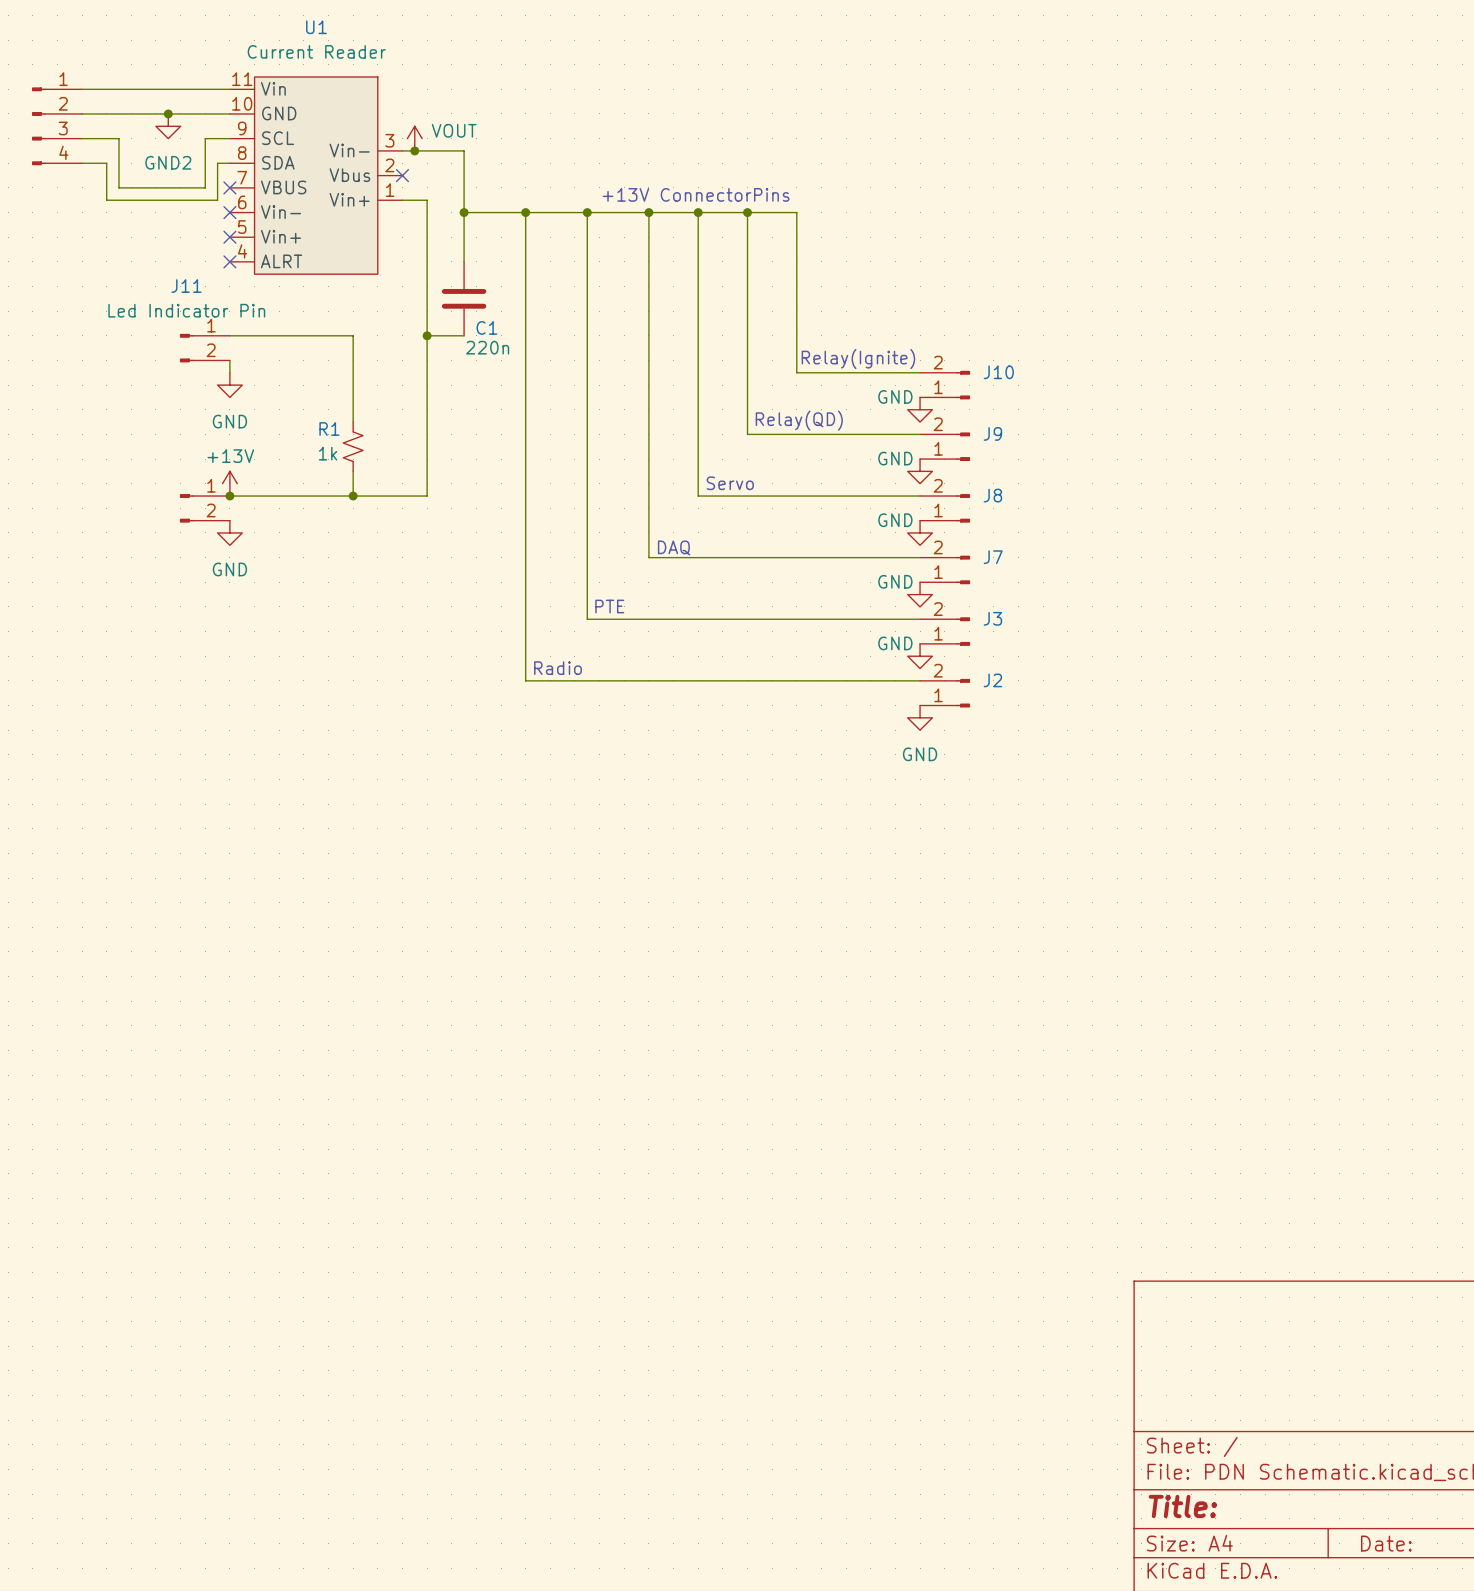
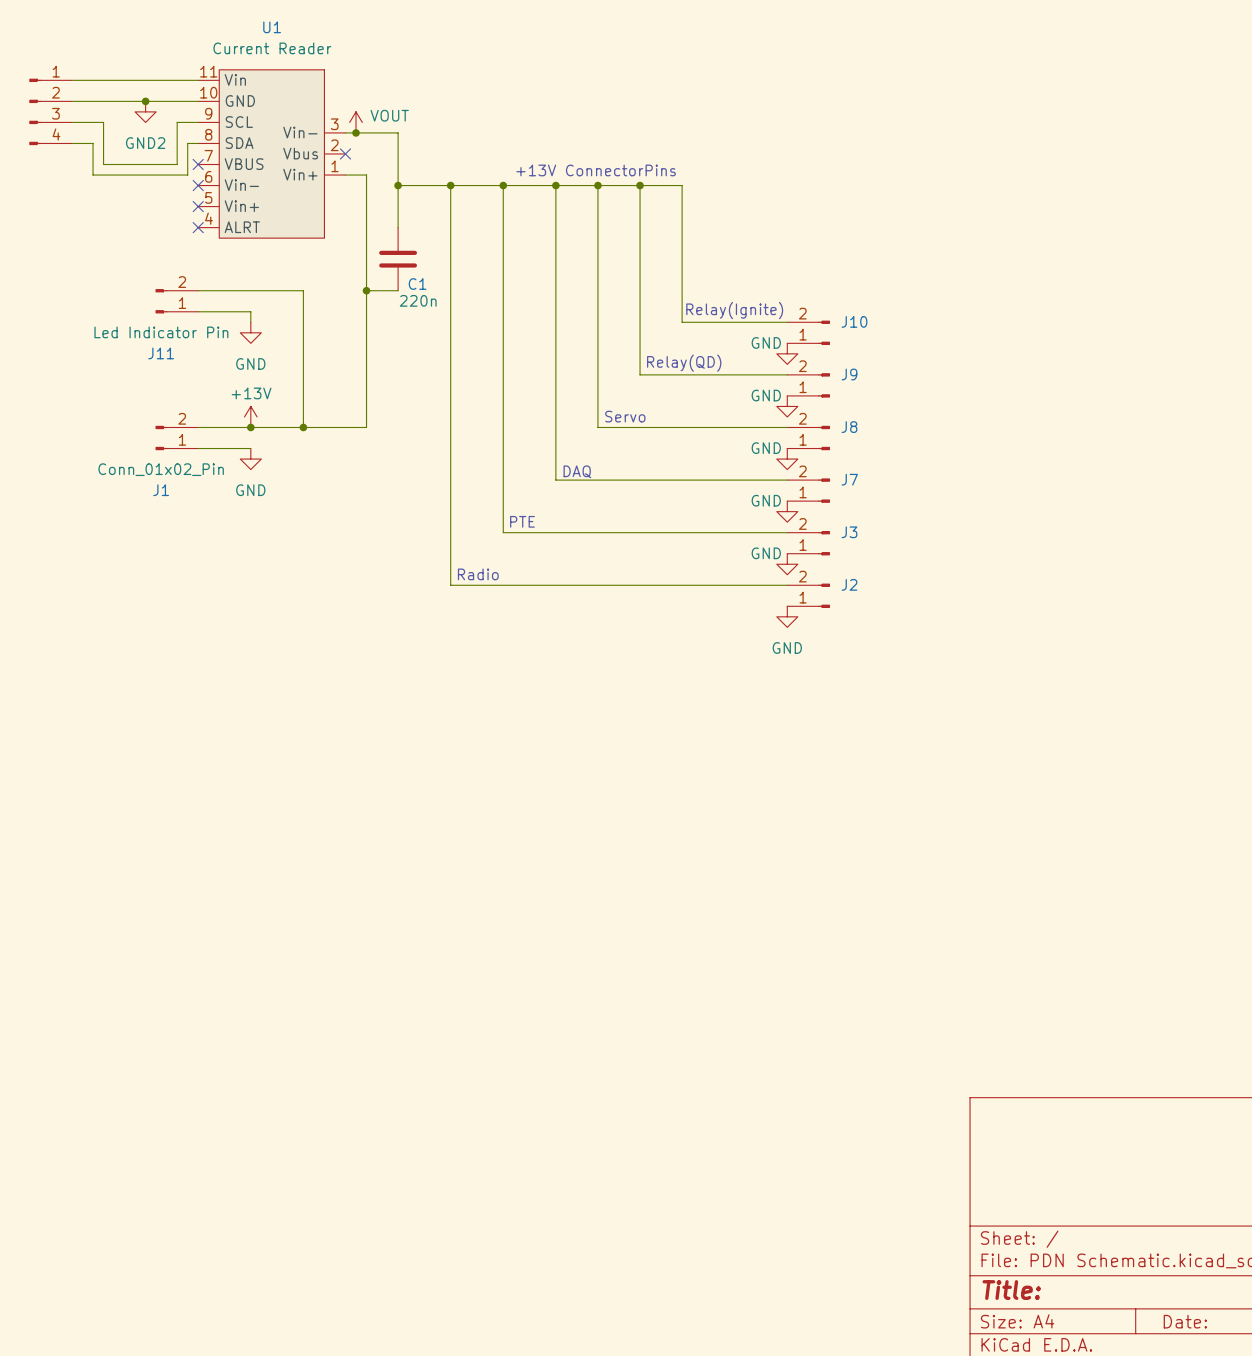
J11 flip: as is (186, 348) -> up-down (161, 301)
wire: (229, 360) (229, 372) -> (198, 311) (250, 311) (250, 322)
power symbol position: GND (229, 385) -> GND (250, 332)
R1: 1k (353, 446) -> none
power symbol position: +13V (229, 483) -> +13V (250, 416)
junction: (229, 496) -> none
junction: none -> (250, 427)
J1 flip: as is (186, 508) -> up-down (161, 438)
wire: none -> (198, 448) (250, 448)
power symbol position: GND (229, 532) -> GND (250, 459)
J1 value: none -> Conn_01x02_Pin (161, 469)
J1 name: none -> J1 (161, 490)

